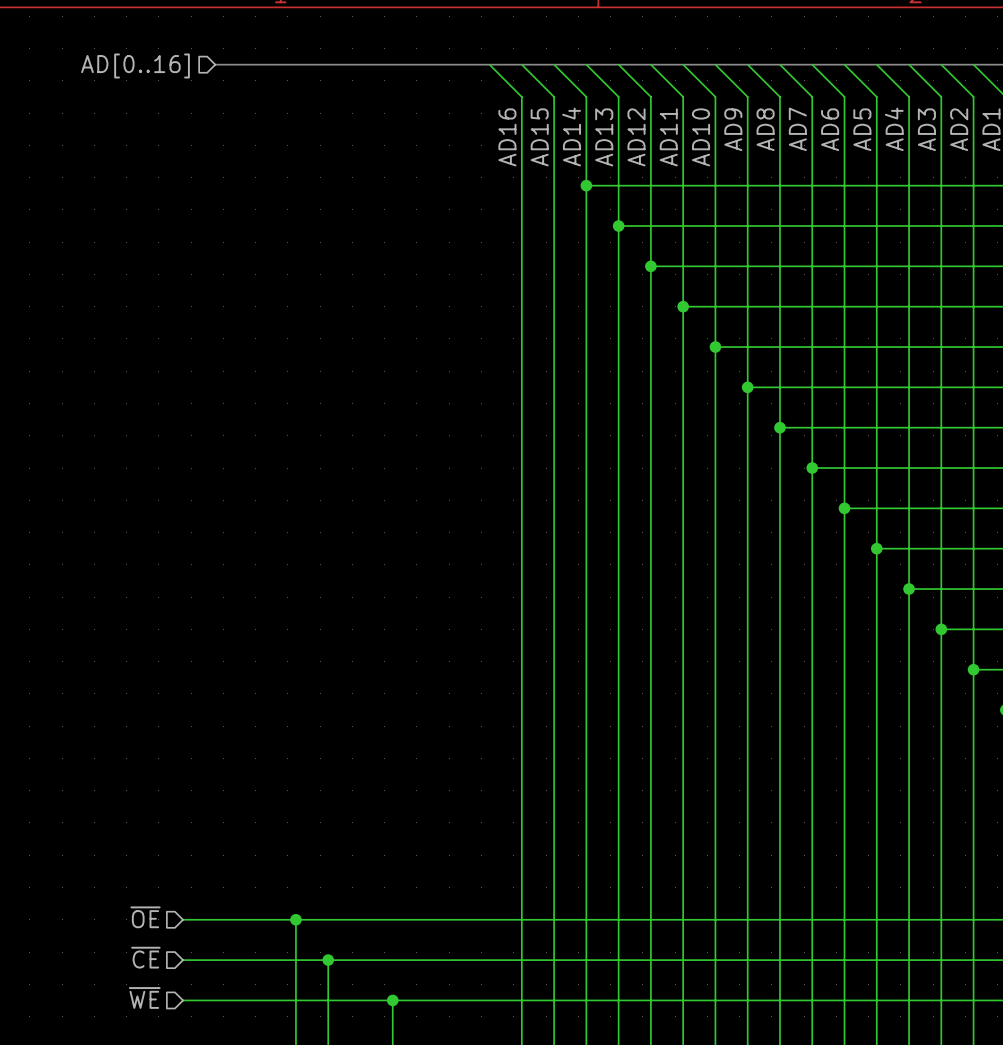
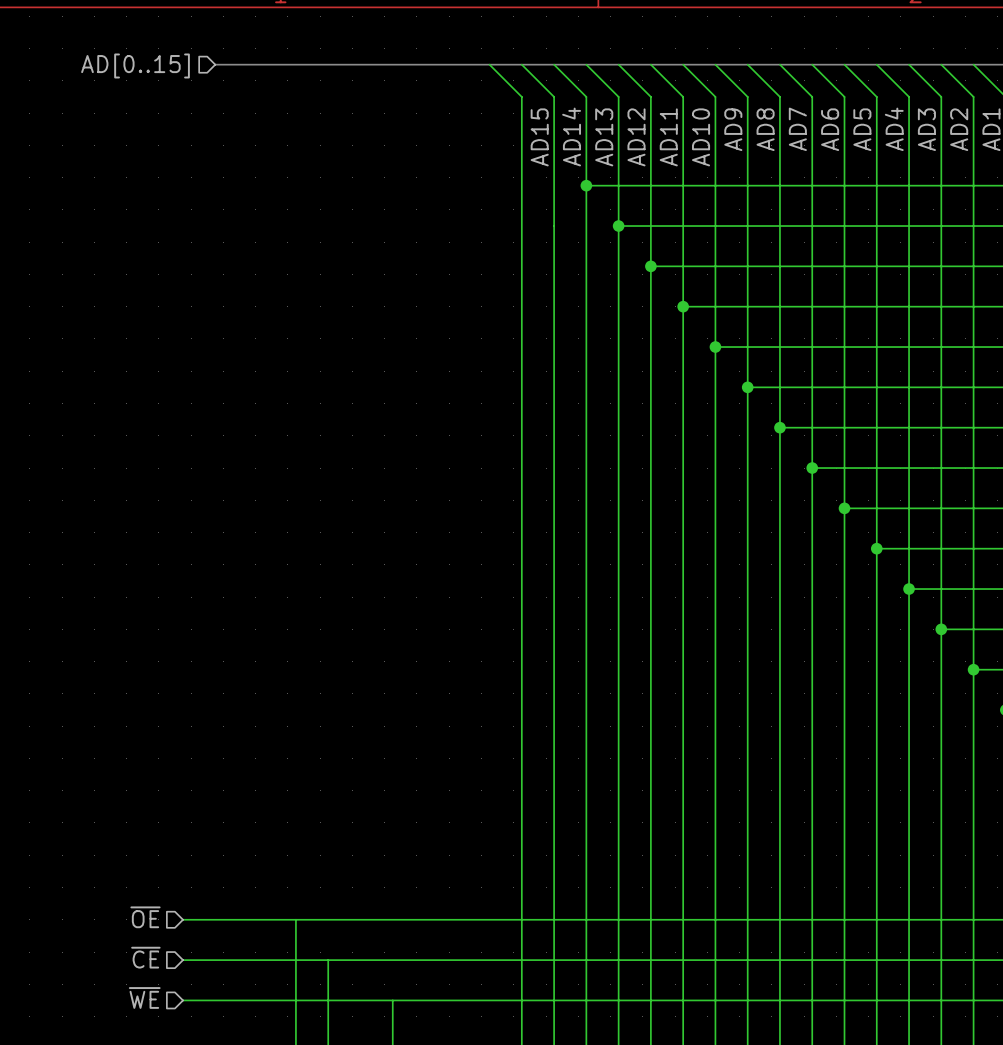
hierarchical label: AD[0..16] (135, 65) -> AD[0..15] (135, 65)
label: AD16 (507, 137) -> none
junction: (295, 919) -> none
junction: (328, 960) -> none
junction: (392, 1000) -> none

